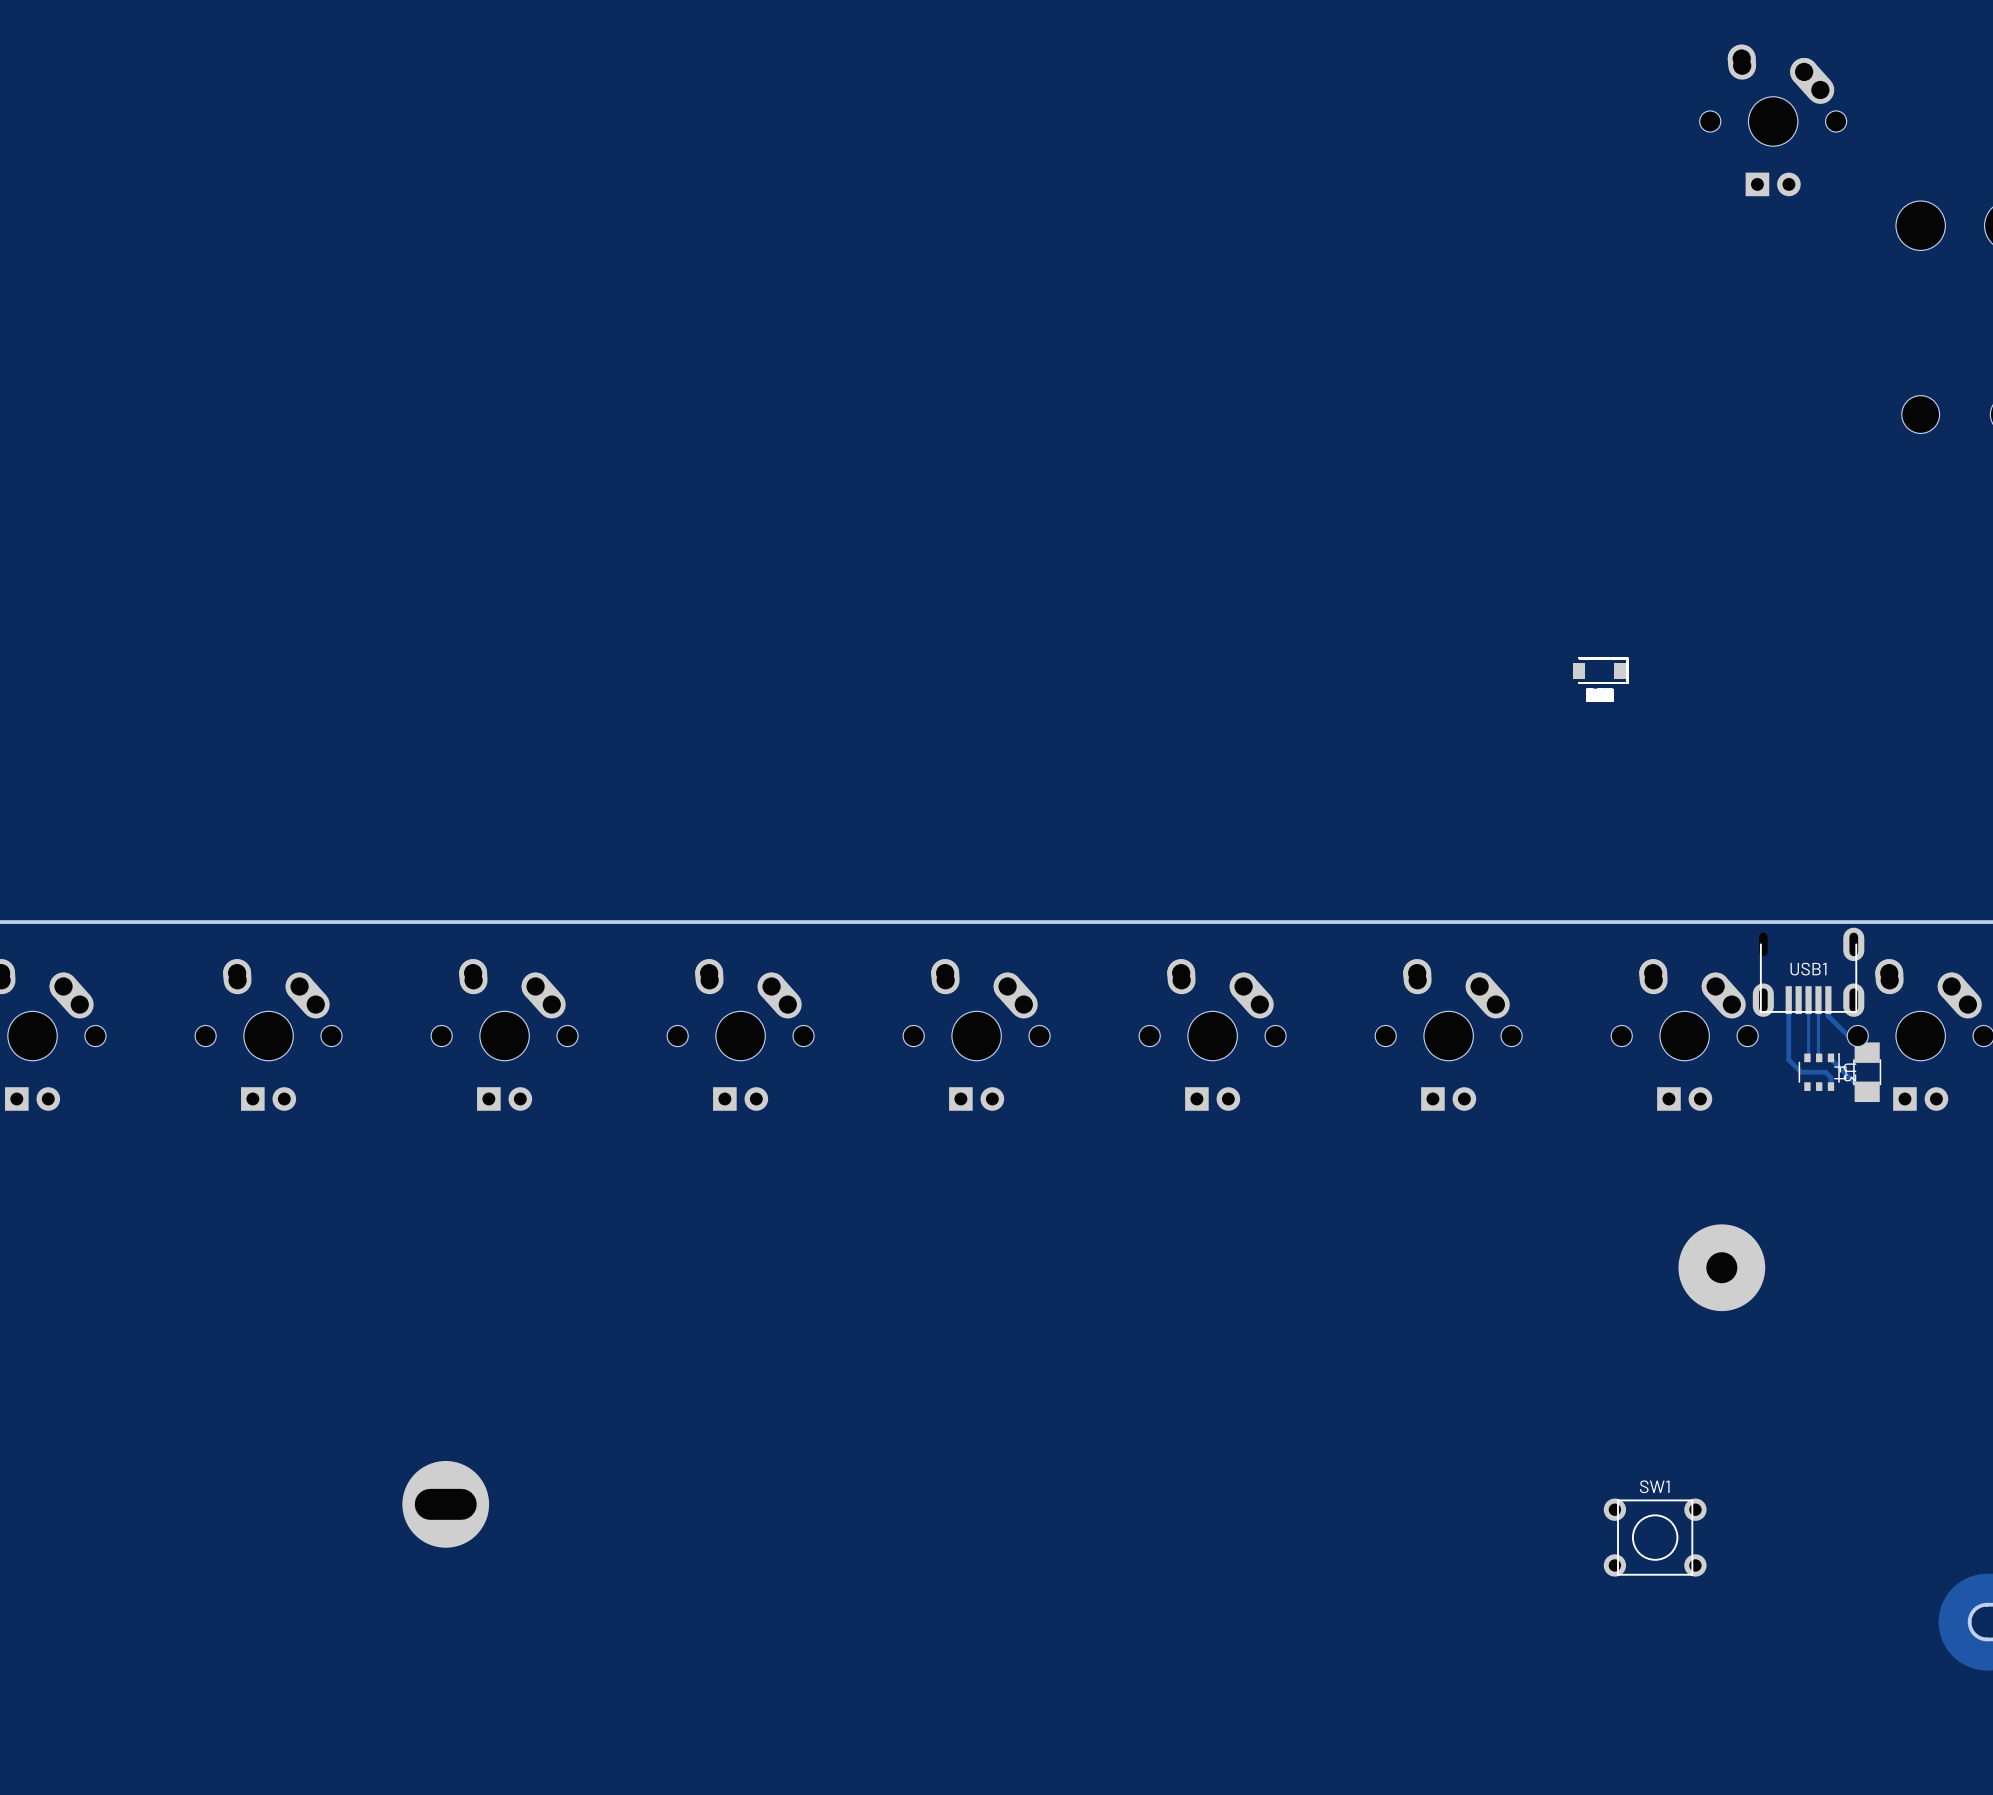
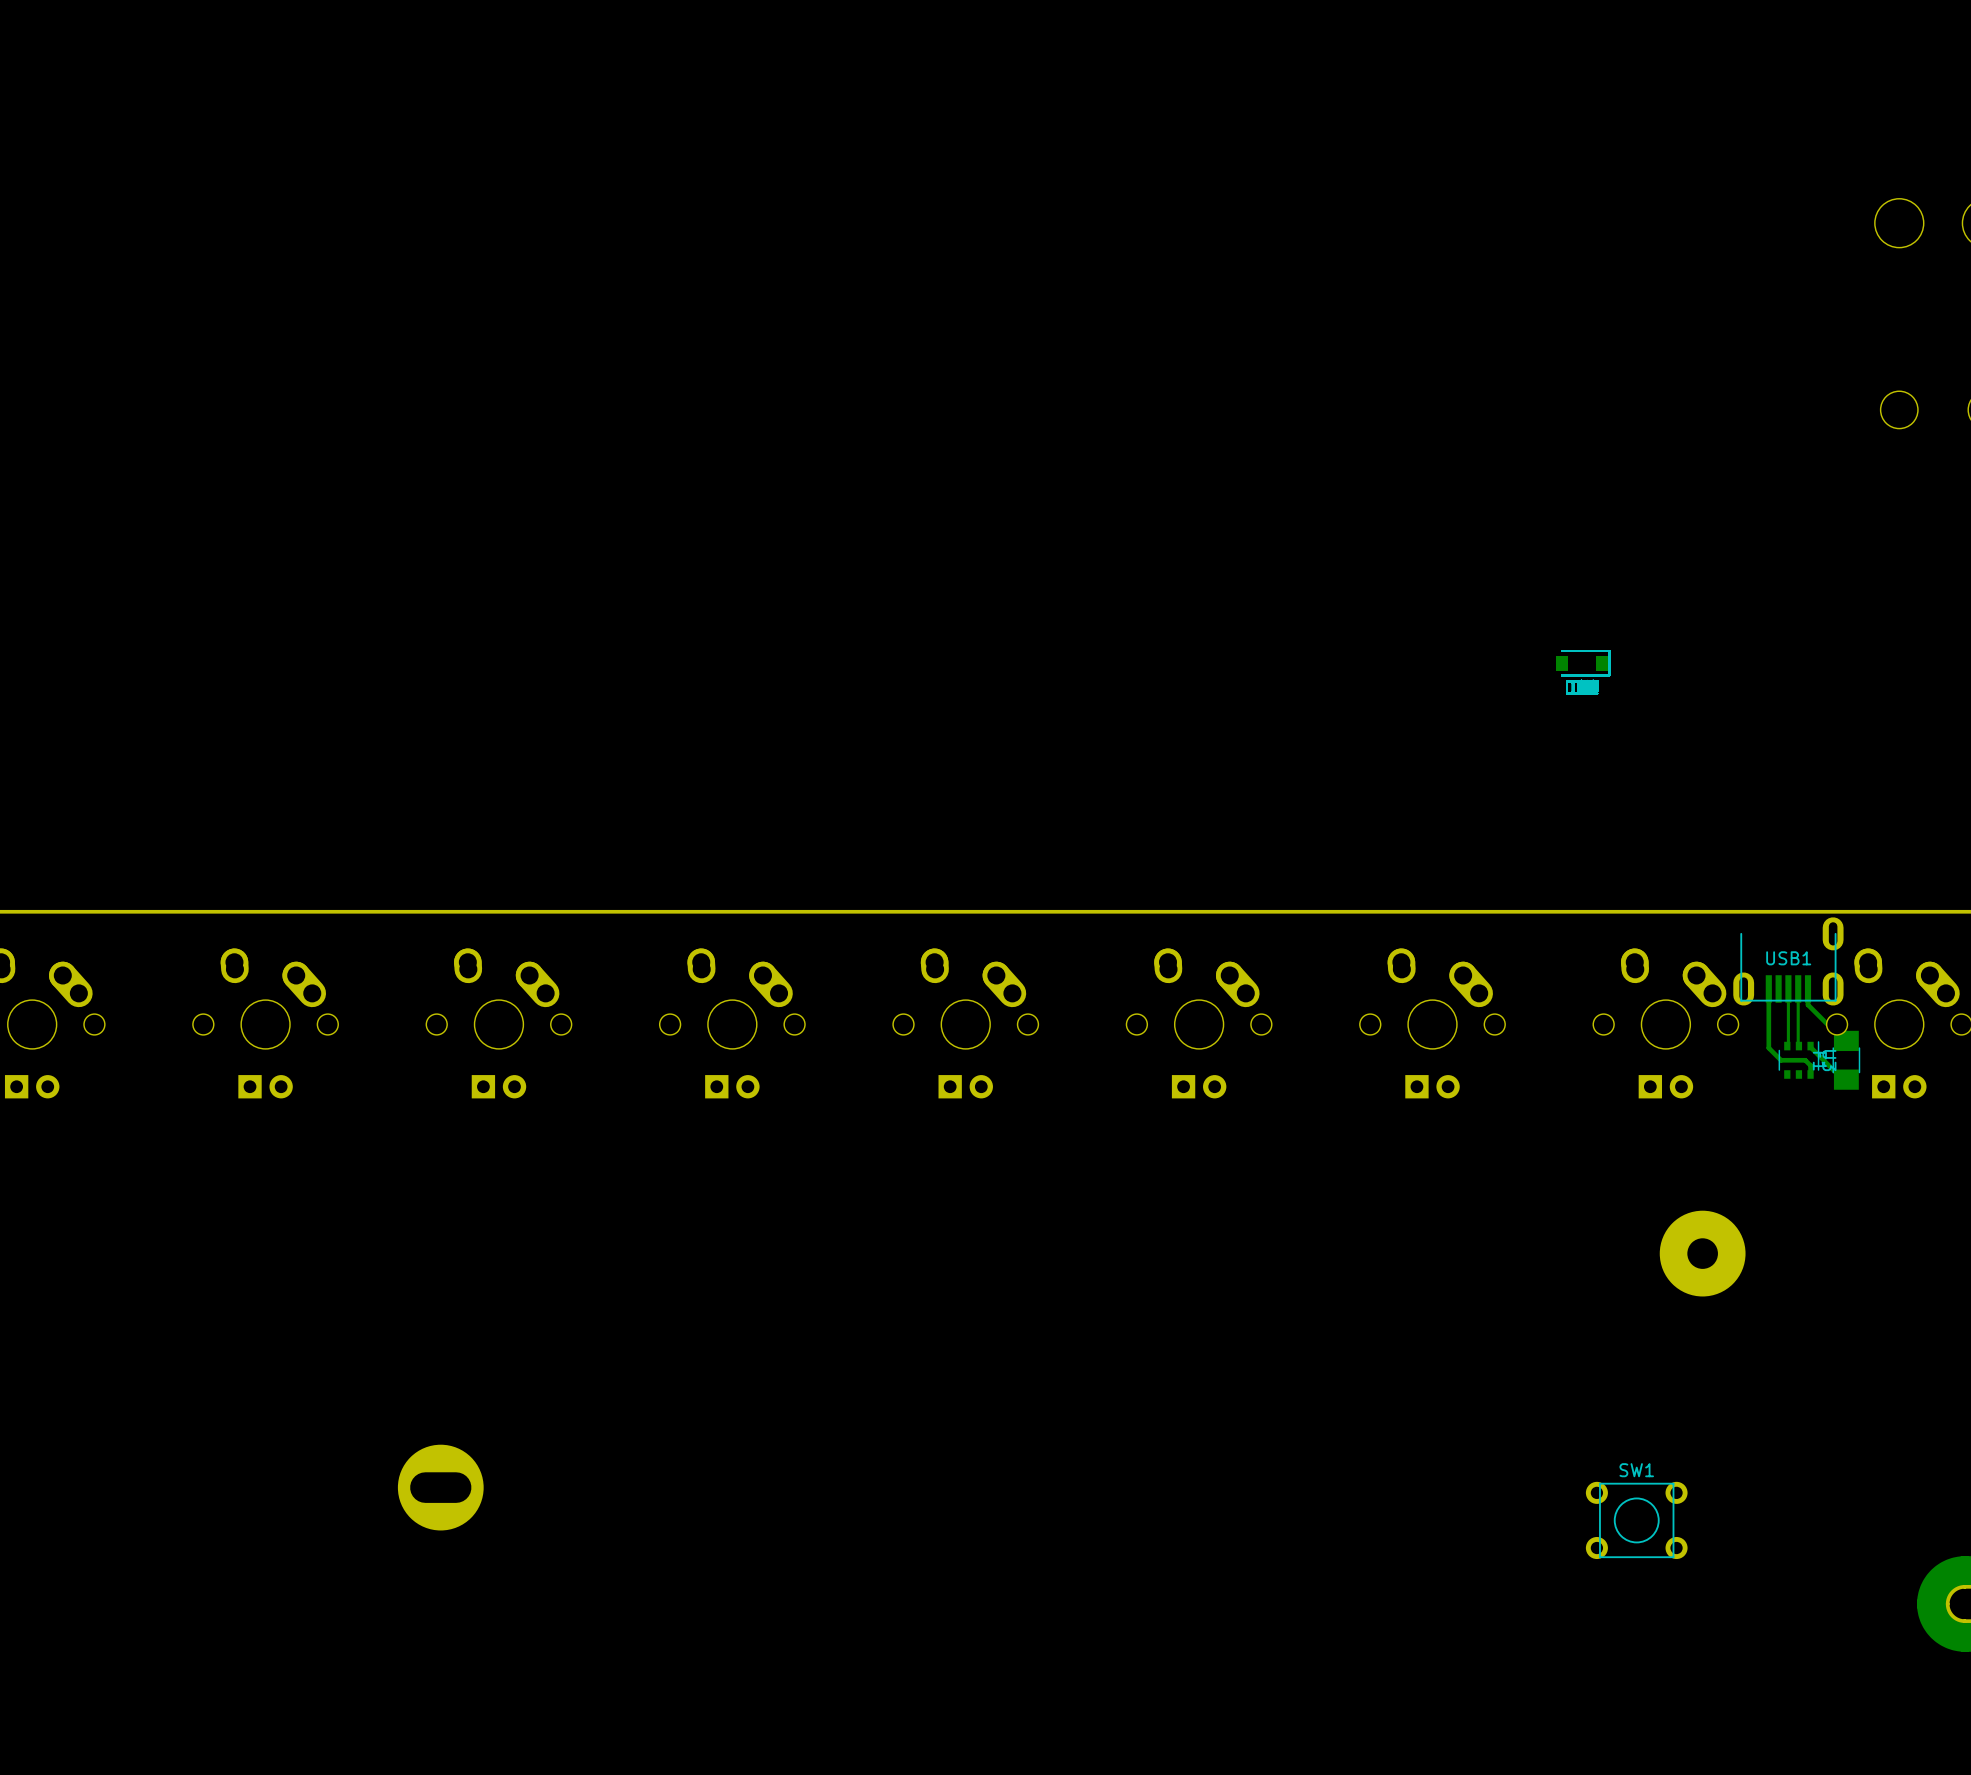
part: (1773, 120) -> none

